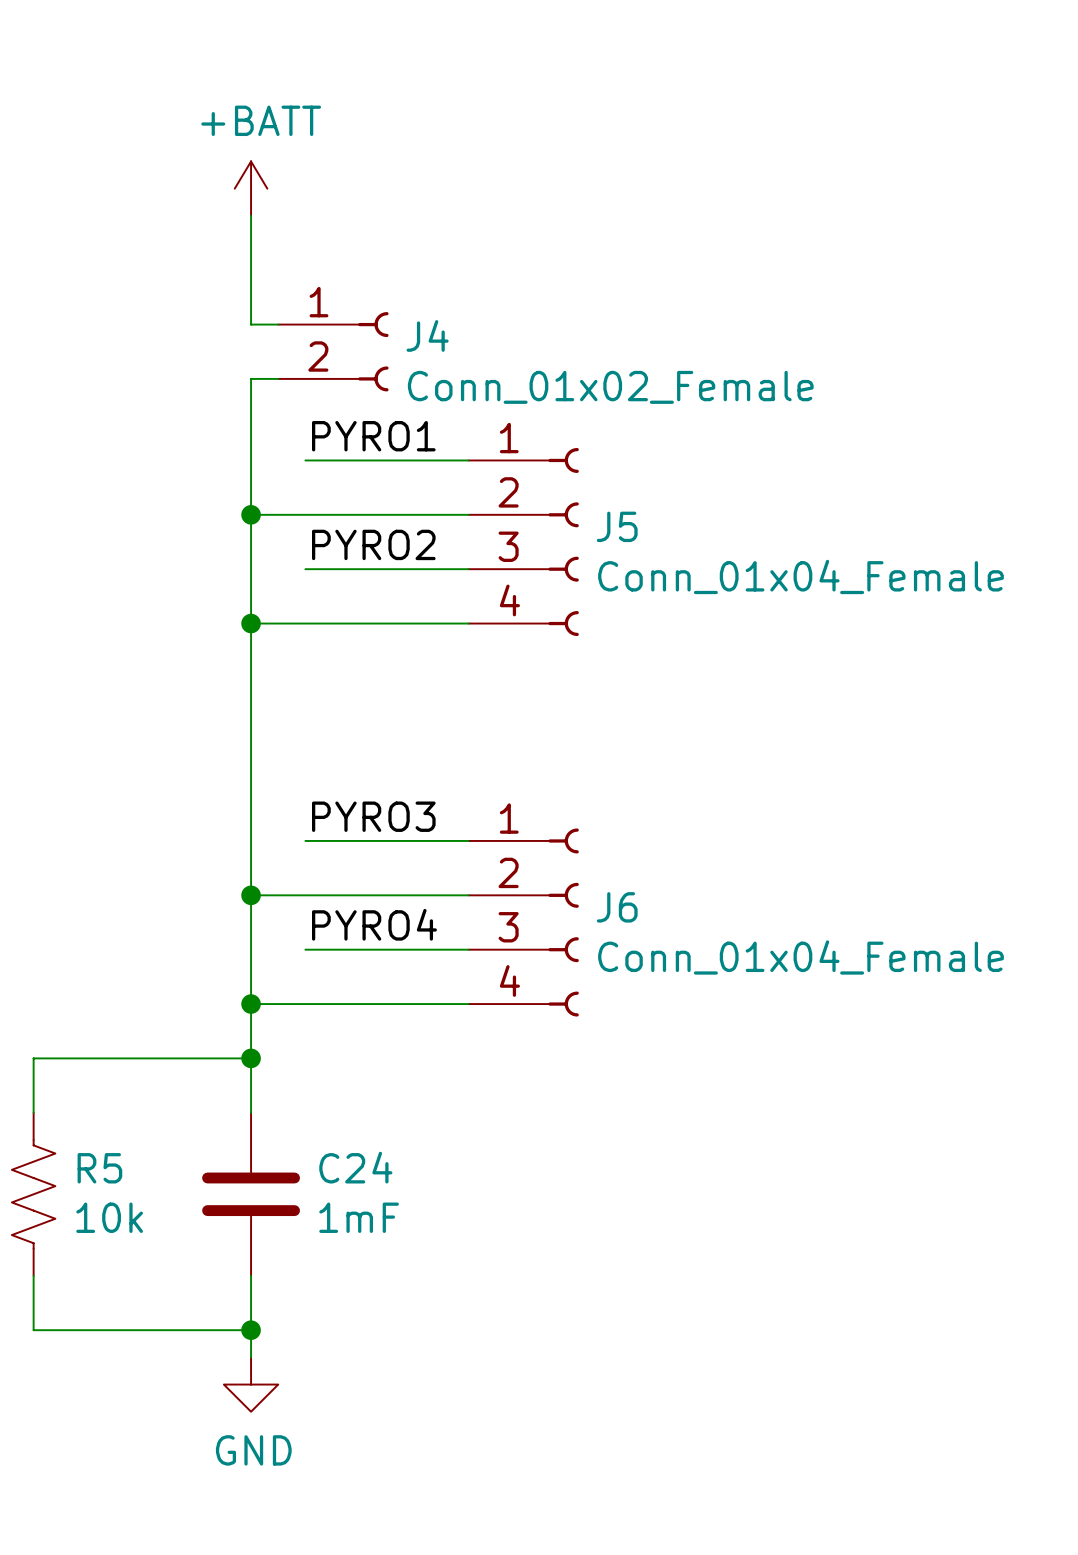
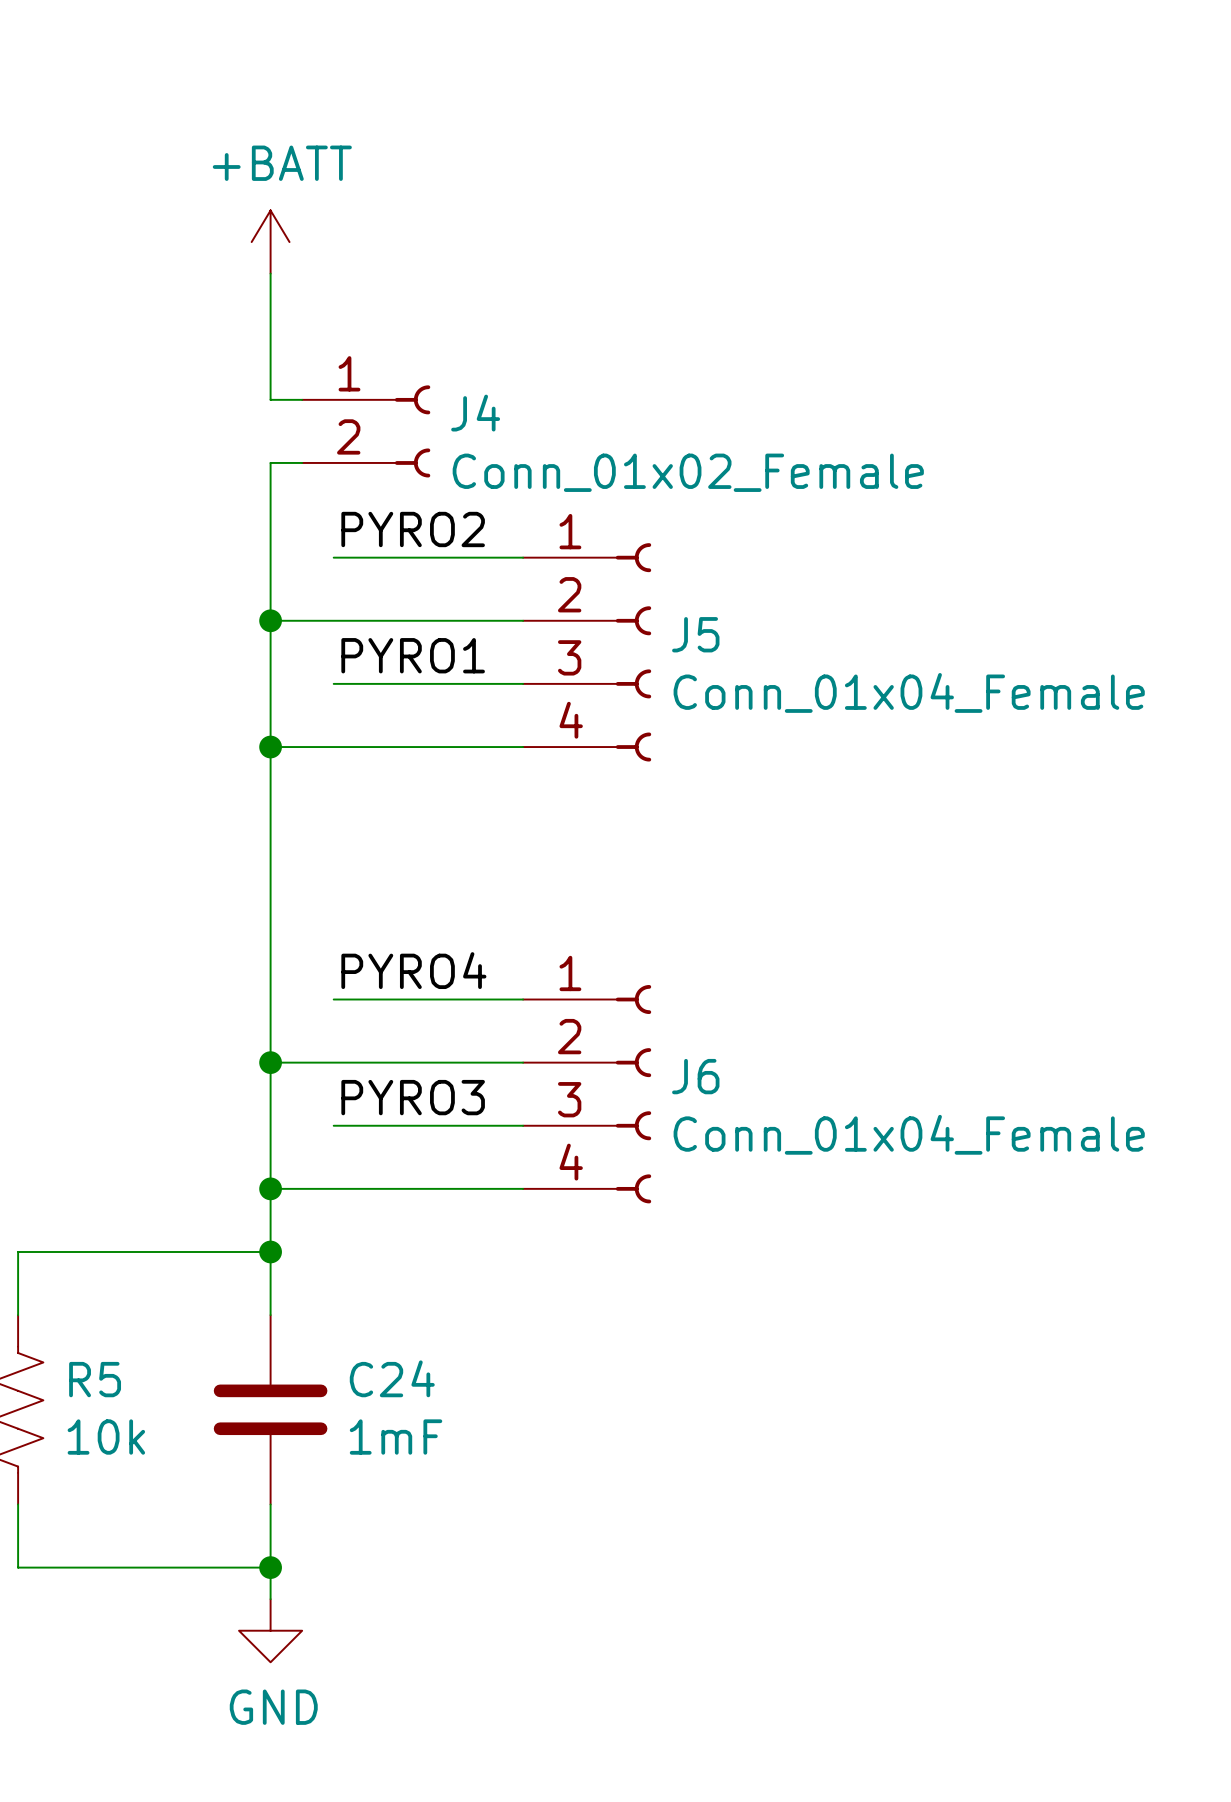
label: PYRO1 (373, 436) -> PYRO2 (413, 529)
label: PYRO2 (373, 544) -> PYRO1 (413, 655)
label: PYRO3 (373, 816) -> PYRO4 (413, 970)
label: PYRO4 (374, 924) -> PYRO3 (413, 1097)

